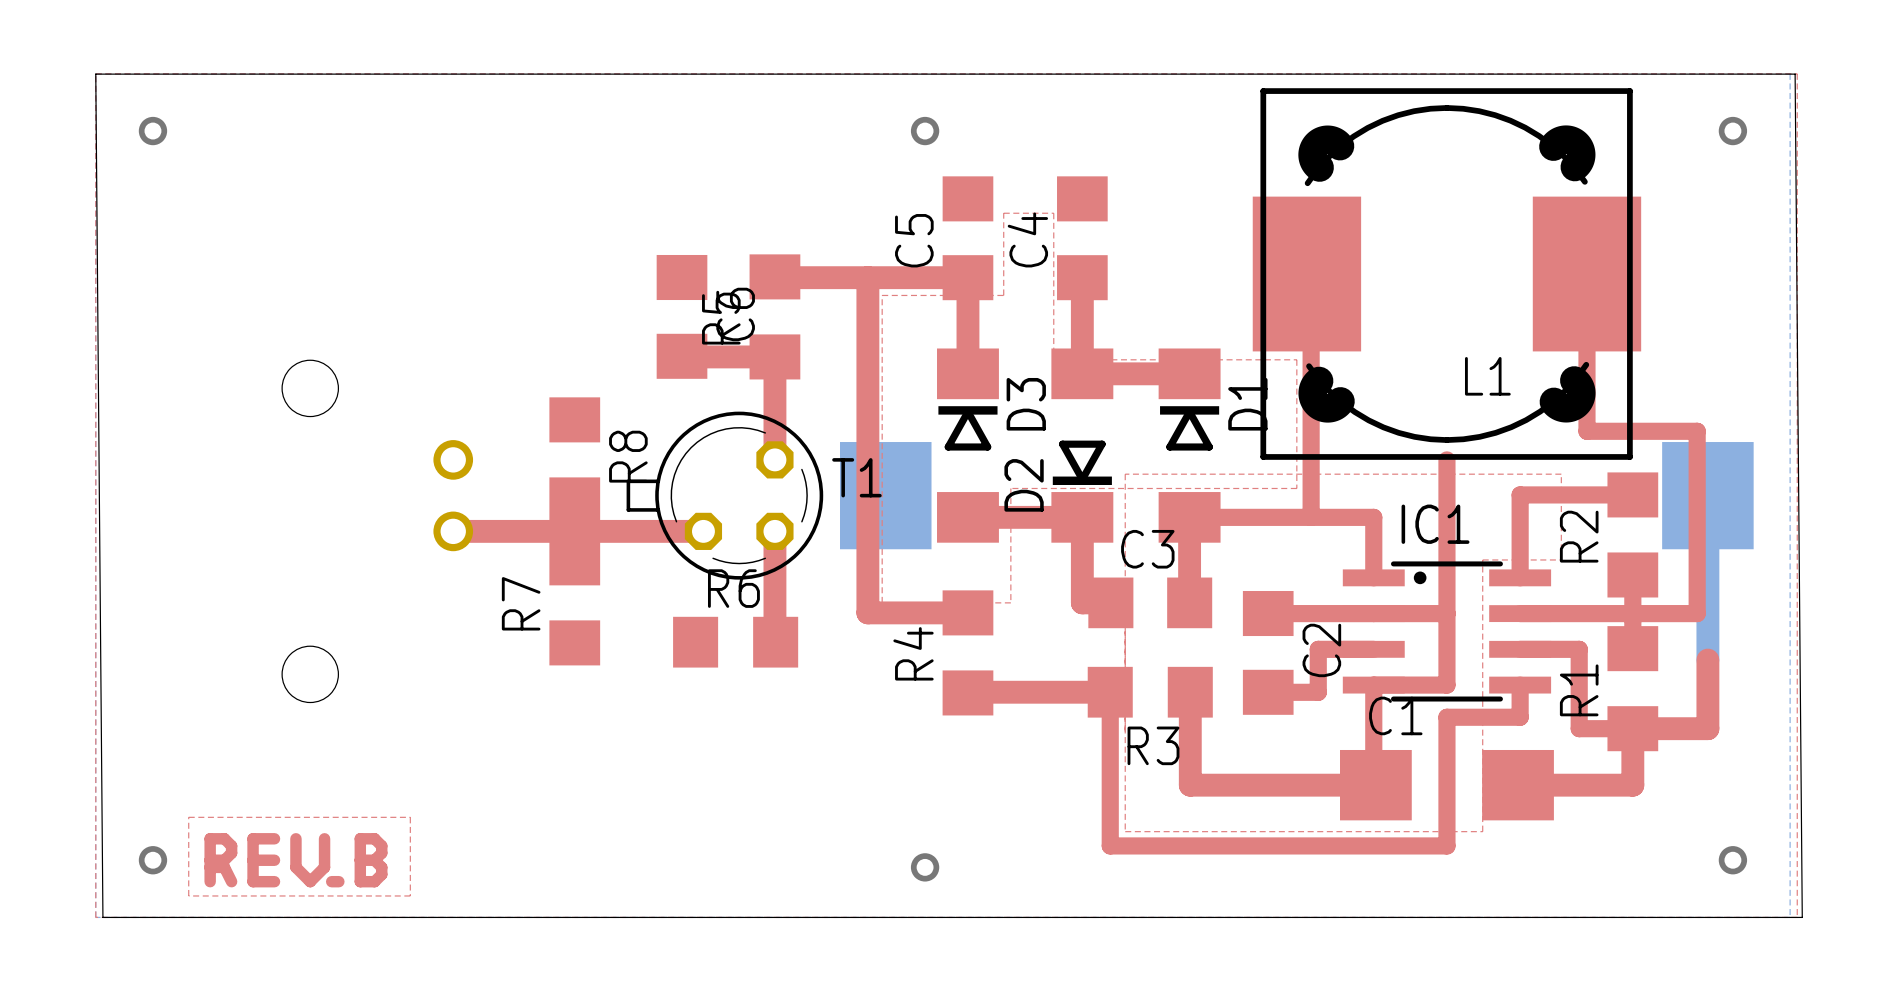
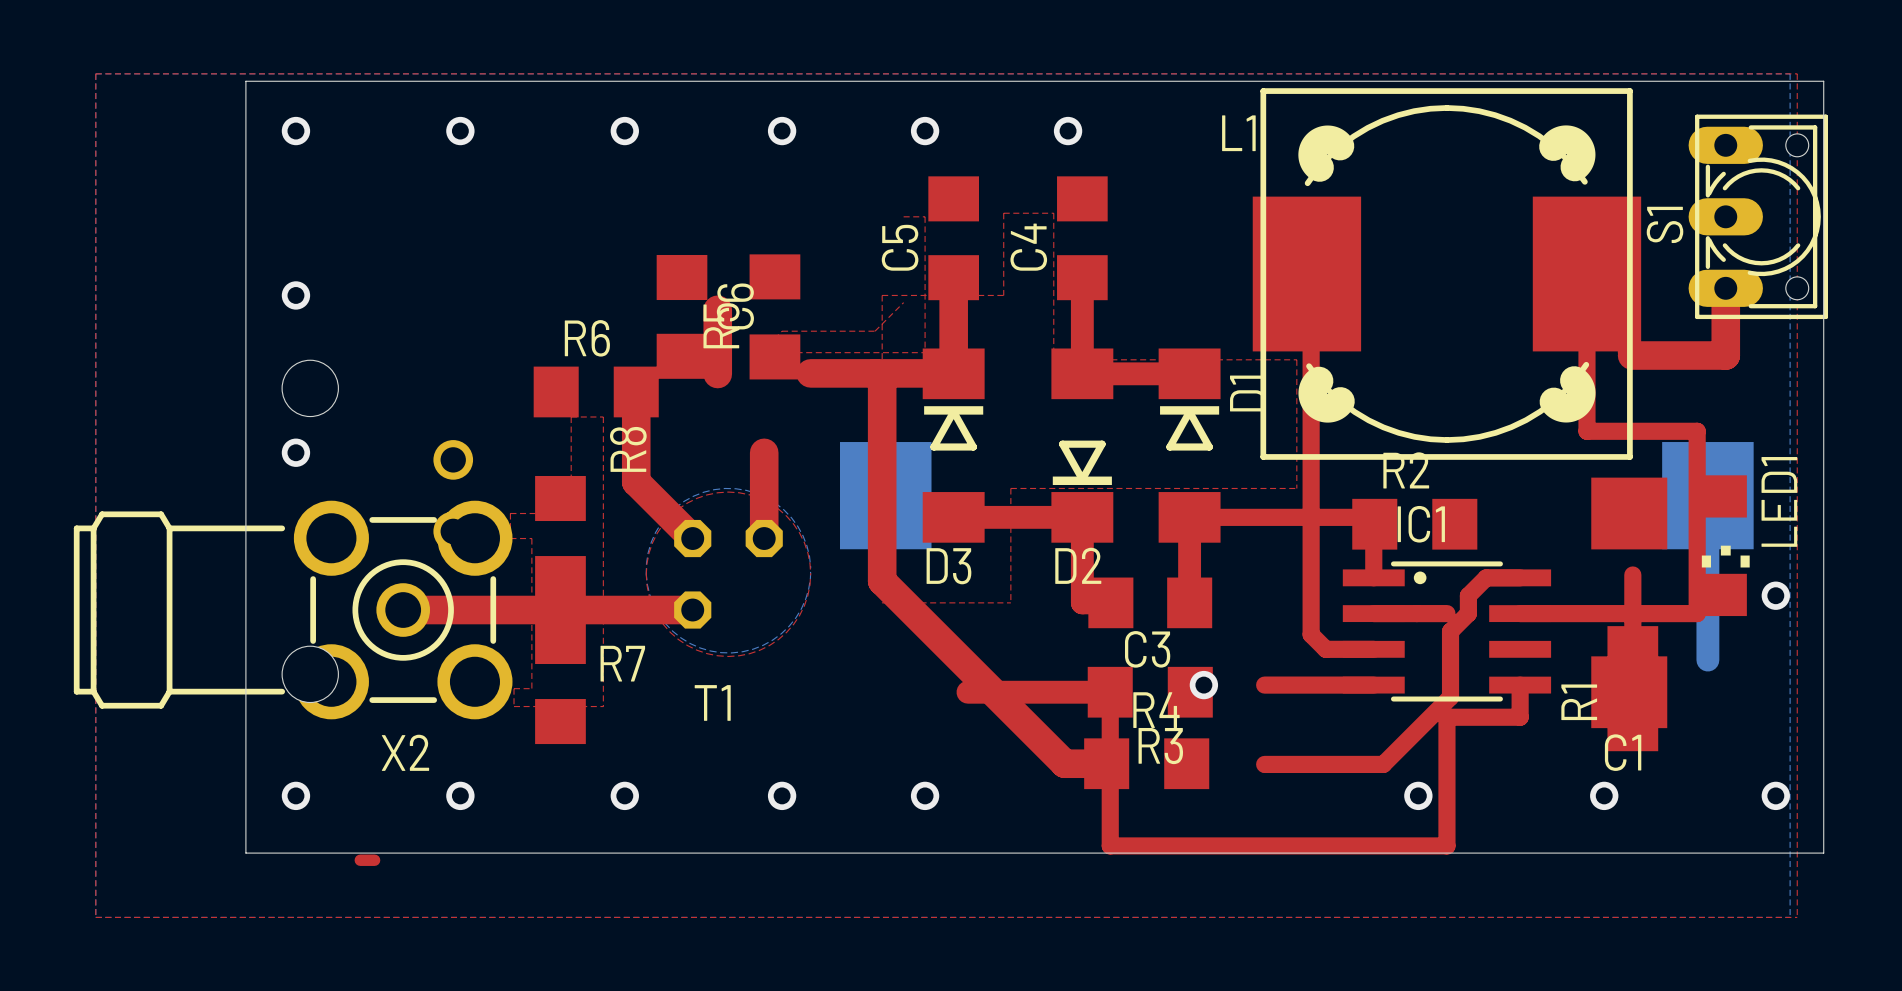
board edge: (95, 74) (1795, 74) (1802, 917) (102, 917) (95, 74) -> (245, 81) (245, 853) (1823, 853) (1823, 81) (245, 81)
via: (152, 131) -> none
via: none -> (295, 131)
via: none -> (460, 131)
via: none -> (624, 131)
via: none -> (782, 131)
via: none -> (1068, 131)
via: (1732, 131) -> none
top zone outline: none -> (903, 216) (925, 216) (925, 352) (767, 352) (767, 345) (782, 331) (875, 331) (903, 302)
S1: none -> (1758, 216)
C5 position: (967, 238) -> (953, 238)
top track: (774, 276) (967, 277) (967, 373) -> none
top track: (867, 277) (867, 612) (967, 612) -> none
top track: none -> (953, 277) (953, 373) (810, 373)
top track: none -> (1725, 288) (1725, 355) (1632, 355) (1629, 352) (1629, 331) (1629, 334)
via: none -> (295, 295)
top track: none -> (717, 309) (717, 374)
top track: (682, 356) (774, 356) (774, 459) -> none
top track: none -> (875, 373) (882, 380) (882, 581) (1064, 763) (1106, 763)
L1 name position: L1 (1487, 376) -> L1 (1238, 133)
top track: none -> (636, 391) (636, 482) (692, 538)
D3 name rotation: 0° (1026, 404) -> 90° clockwise (948, 566)
D3 name position: D3 (1026, 404) -> D3 (948, 566)
top zone outline: none -> (571, 416) (571, 513) (510, 513) (510, 538) (531, 538) (531, 688) (514, 688) (514, 706) (603, 706) (603, 416) (571, 416)
D3 position: (967, 445) -> (953, 445)
via: none -> (295, 452)
top track: none -> (764, 452) (764, 538)
R8 position: (574, 459) -> (560, 538)
top track: (1446, 459) (1446, 685) (1375, 685) -> none
top zone outline: (1125, 474) (1125, 831) (1482, 831) (1482, 559) (1561, 559) (1561, 474) (1125, 474) -> none
D2 name rotation: 0° (1024, 485) -> 90° clockwise (1078, 565)
D2 name position: D2 (1024, 485) -> D2 (1078, 565)
bottom zone outline: none -> (724, 488) (756, 493) (784, 510) (803, 535) (810, 567) (805, 598) (789, 626) (763, 645) (732, 652) (700, 648) (672, 631) (653, 605) (646, 574) (651, 542) (667, 515) (693, 496) (724, 488)
top zone outline: none -> (728, 492) (759, 498) (786, 516) (804, 542) (810, 574) (804, 605) (786, 632) (759, 650) (728, 656) (697, 650) (670, 632) (652, 605) (646, 574) (652, 542) (670, 516) (697, 498) (728, 492)
top track: (1632, 494) (1520, 494) (1520, 577) -> (1264, 767) (1264, 764) (1383, 764) (1450, 697) (1450, 631) (1468, 613) (1468, 595) (1486, 577) (1520, 577)
T1 side: top (724, 495) -> bottom (728, 574)
top track: (453, 531) (703, 531) -> none
top track: (774, 531) (775, 642) -> none
R2 rotation: 0° (1632, 534) -> 90° clockwise (1414, 524)
R2 position: (1632, 534) -> (1414, 524)
LED1: none -> (1725, 545)
C3 name position: C3 (1147, 549) -> C3 (1147, 649)
via: none -> (1775, 595)
R7 position: (574, 602) -> (560, 681)
R7 name rotation: 0° (521, 603) -> 90° clockwise (622, 663)
R7 name position: R7 (521, 603) -> R7 (622, 663)
X2: none -> (293, 610)
top track: none -> (403, 610) (692, 610)
top track: (1268, 613) (1373, 613) -> none
R6 position: (735, 642) -> (596, 391)
top track: (1325, 649) (1318, 649) (1318, 692) (1268, 692) -> (1325, 649) (1311, 634) (1311, 517)
top track: (1520, 649) (1579, 649) (1579, 728) (1632, 728) -> none
R4 rotation: 0° (967, 652) -> 90° clockwise (1146, 763)
R4 position: (967, 652) -> (1146, 763)
C2: (1268, 652) -> none
top track: (1707, 660) (1707, 728) (1632, 728) -> none
top track: none -> (1264, 684) (1373, 685) (1357, 685)
via: none -> (1203, 685)
top track: (1373, 685) (1373, 792) (1375, 785) (1190, 785) (1190, 688) (1190, 692) -> none
C1 name position: C1 (1395, 715) -> C1 (1623, 752)
top track: (1632, 728) (1632, 785) (1518, 785) -> none
C1 footprint: [1340, 749, 1554, 821] -> [1591, 477, 1668, 729]
via: none -> (295, 795)
via: none -> (460, 795)
via: none -> (624, 795)
via: none -> (782, 795)
via: none -> (1418, 795)
via: none -> (1604, 795)
via: none -> (1775, 795)
top zone outline: (188, 817) (188, 895) (410, 895) (410, 817) (188, 817) -> none
top track: (274, 838) (253, 838) (253, 881) (274, 881) -> none
top track: (295, 838) (295, 867) (310, 881) (324, 867) (324, 838) -> none
top track: (360, 838) (374, 838) (381, 845) (381, 853) (374, 860) (381, 867) (381, 874) (374, 881) (360, 881) (360, 838) -> none
via: (152, 860) -> none
top track: (210, 860) (224, 860) (231, 853) (231, 845) (224, 838) (210, 838) (210, 881) -> none
top track: (253, 860) (274, 860) -> none
via: (1732, 860) -> none
top track: (210, 867) (224, 867) (231, 881) -> none
via position: (925, 867) -> (925, 795)
top track: (331, 881) (338, 881) -> none

